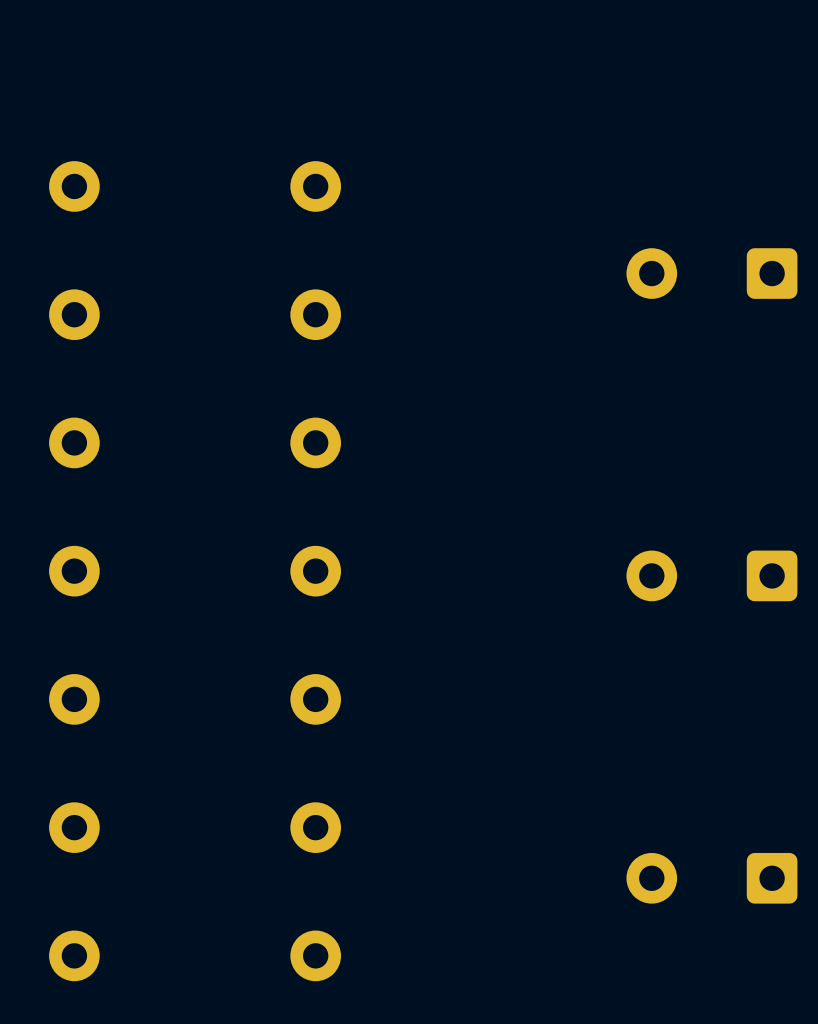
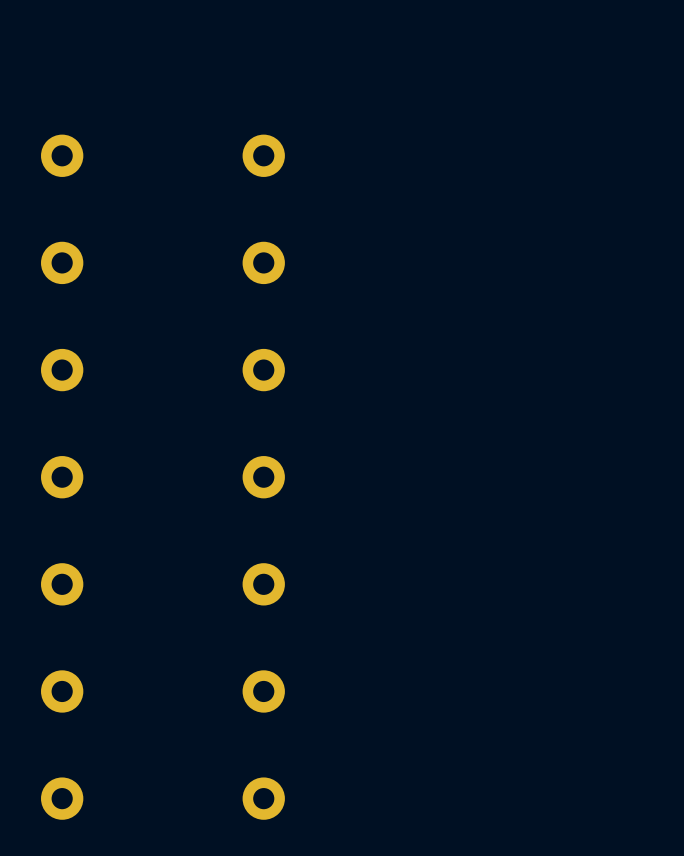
part: (711, 273) -> none
part: (711, 575) -> none
part: (711, 878) -> none

